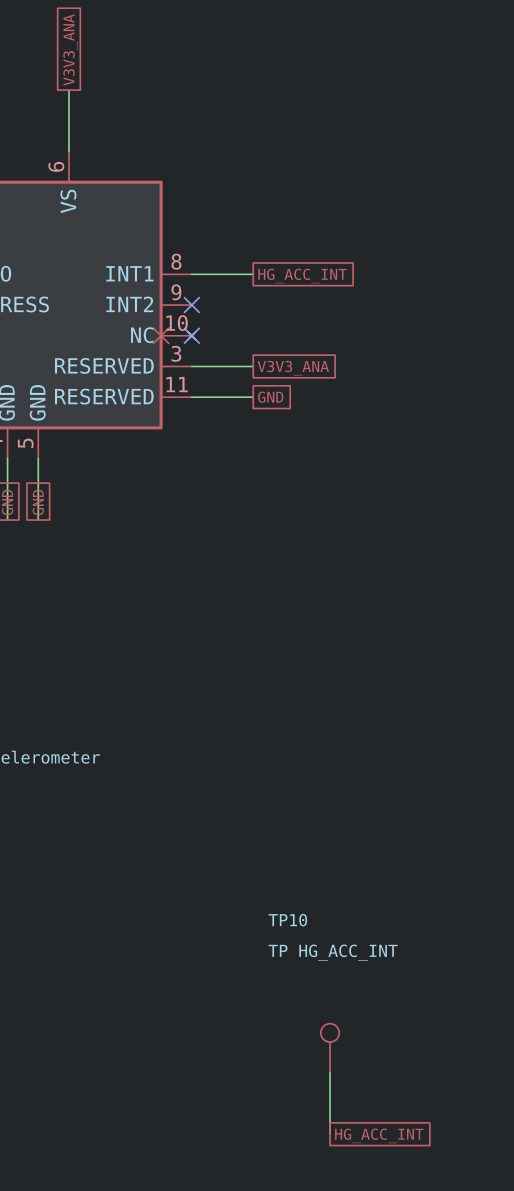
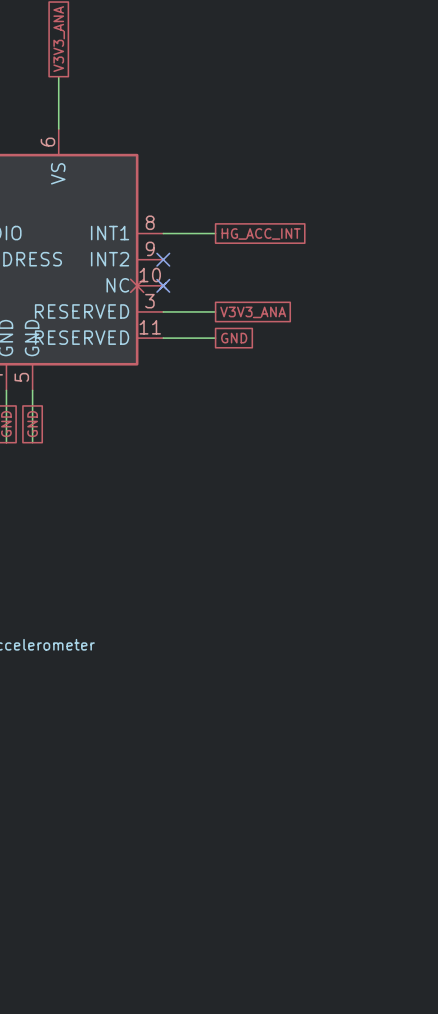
TP10: TP HG_ACC_INT (330, 1048) -> none
wire: (330, 1072) (330, 1134) -> none
global label: HG_ACC_INT (379, 1135) -> none

